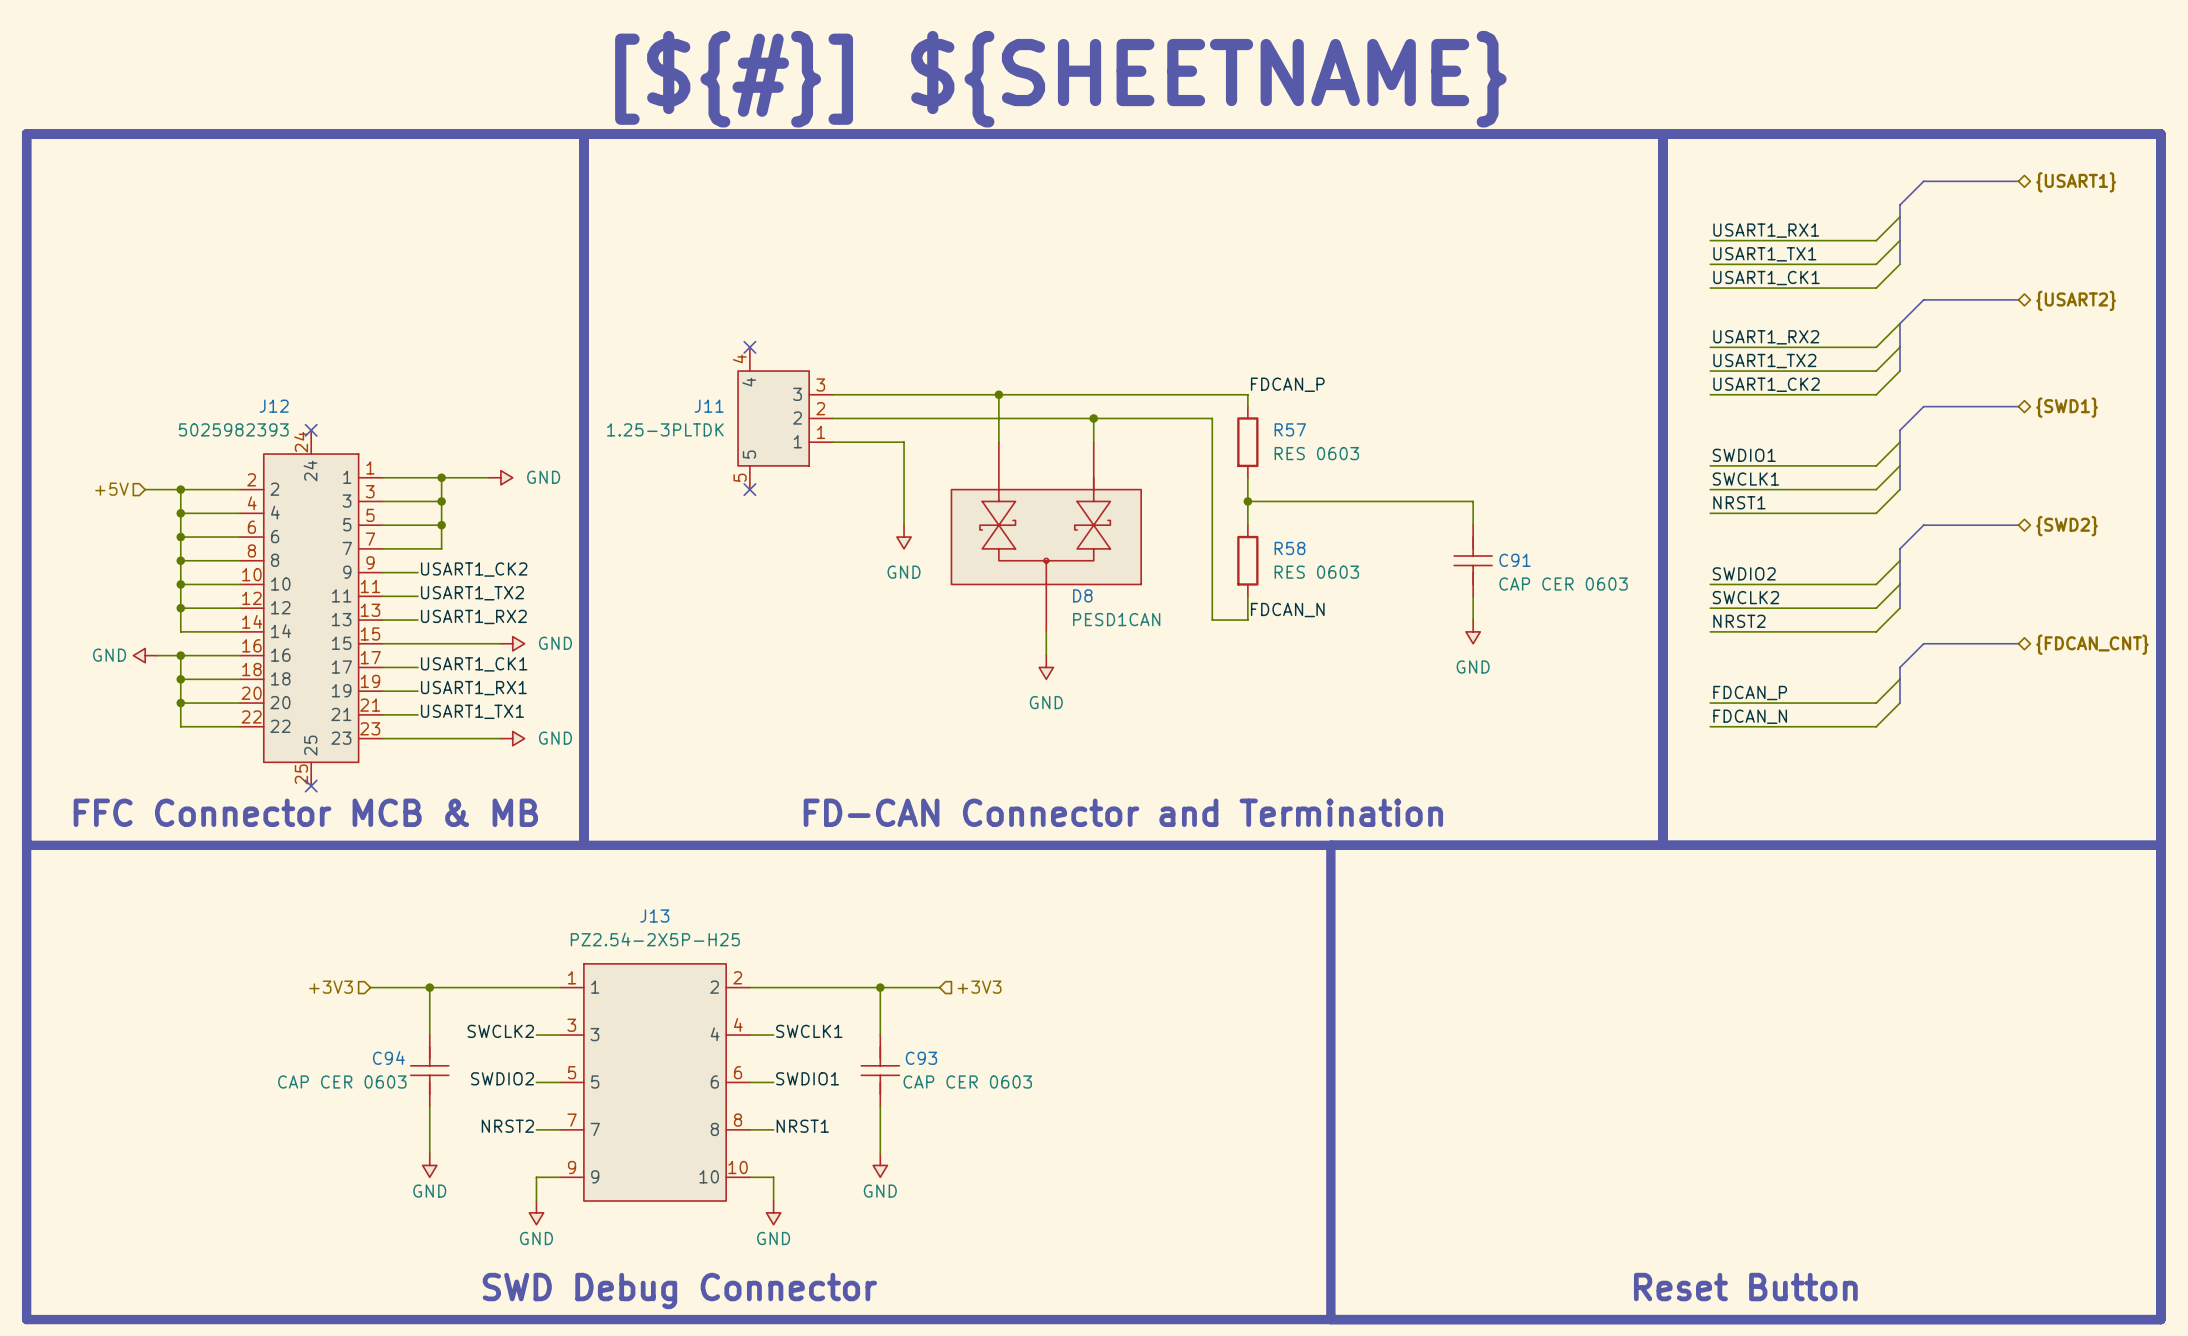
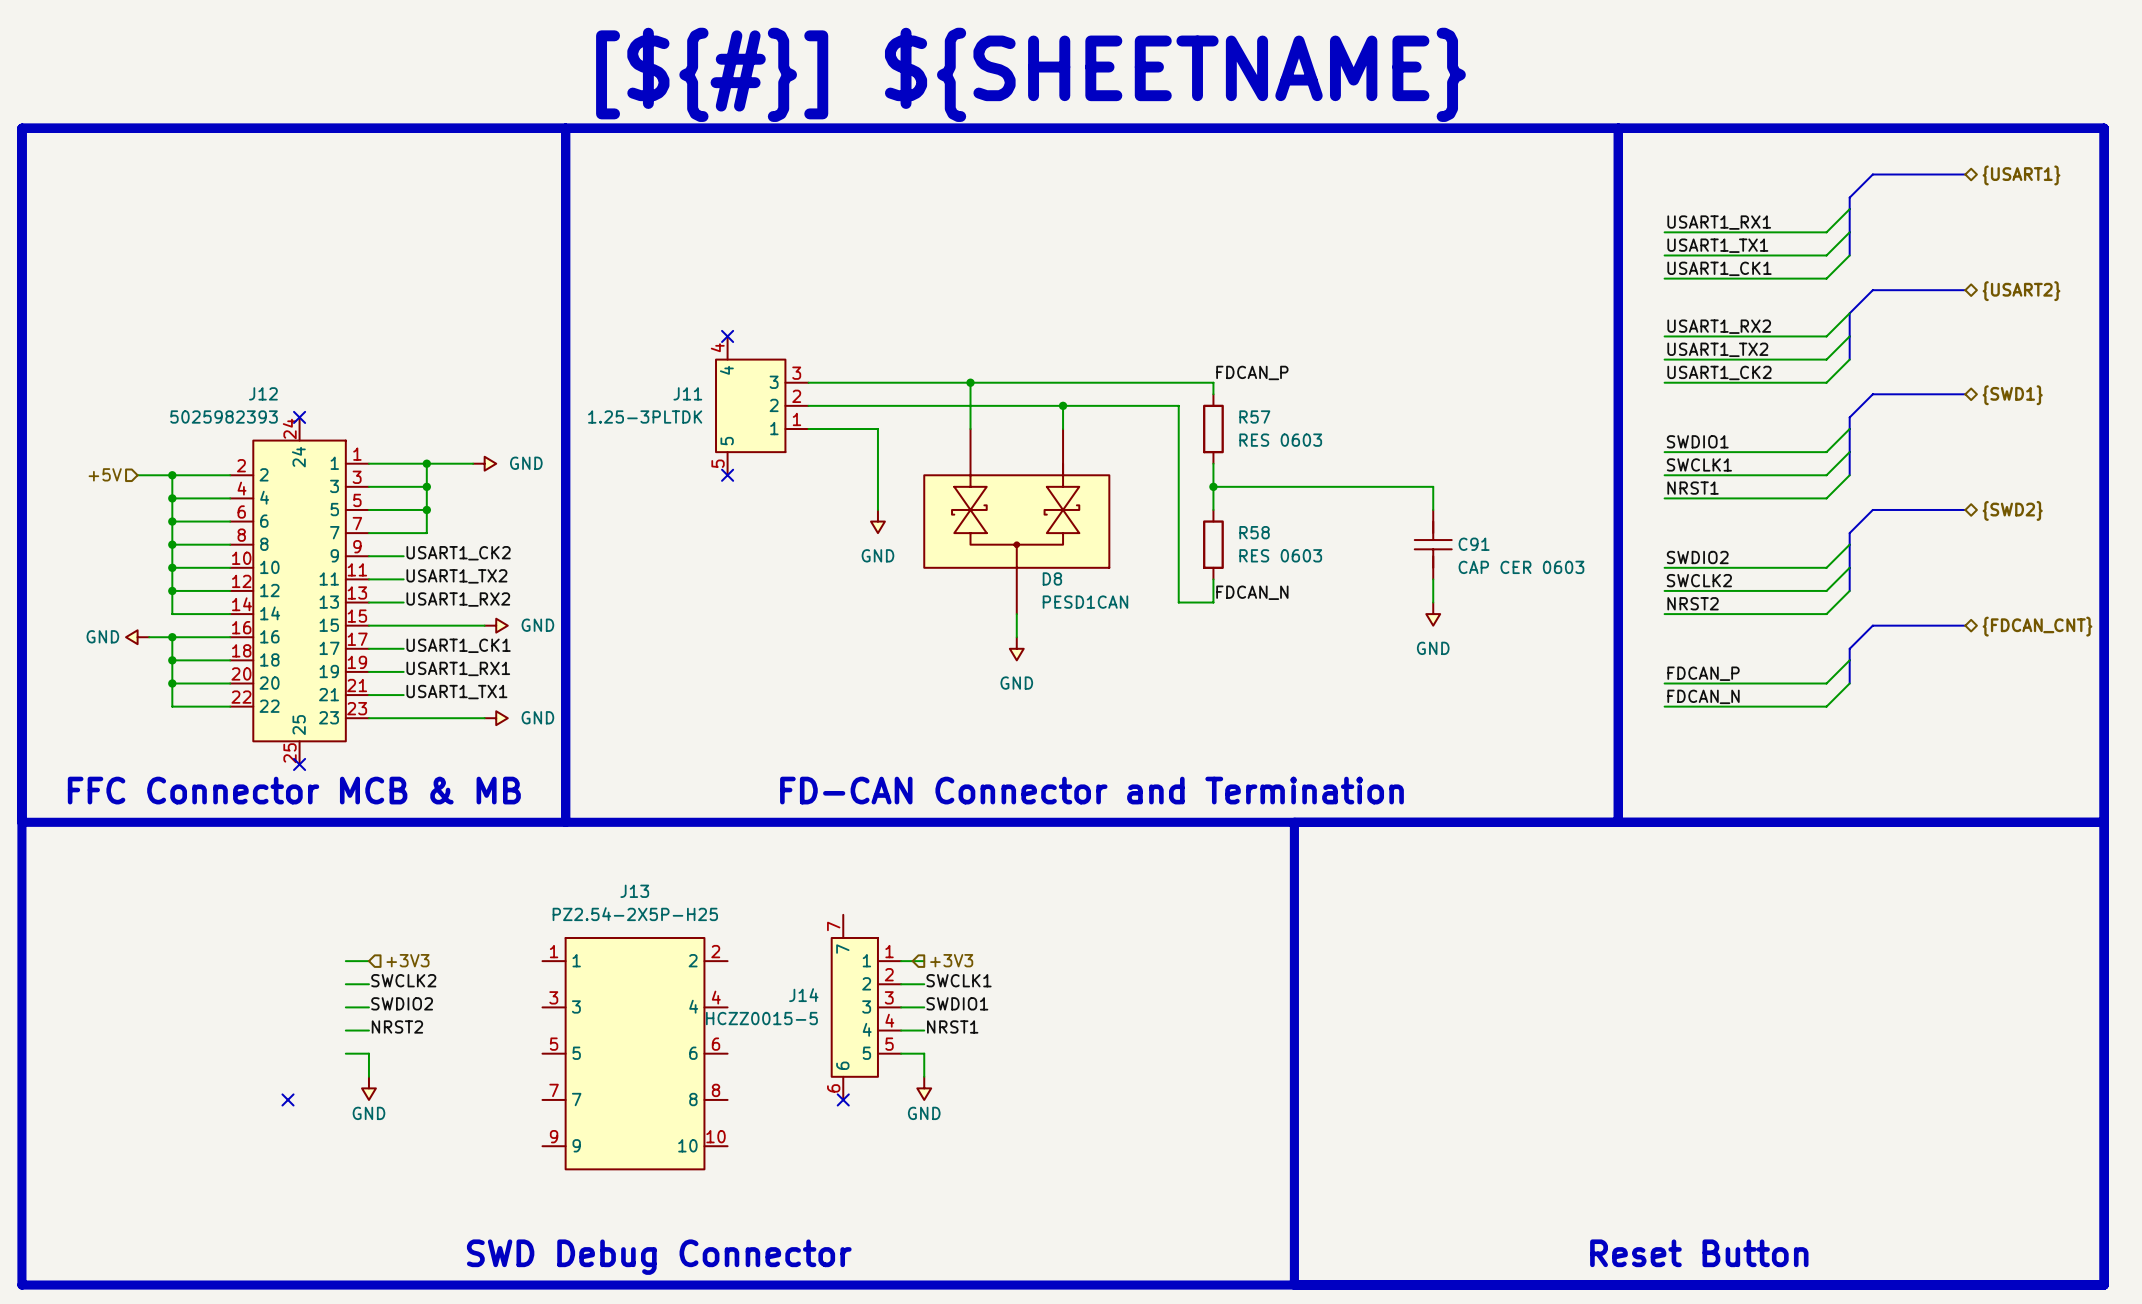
hierarchical label rotation: 0° (331, 987) -> 180° (407, 960)
hierarchical label position: +3V3 (331, 987) -> +3V3 (407, 960)
wire: none -> (345, 961) (357, 961)
wire: (382, 987) (560, 987) -> none
wire: (429, 987) (429, 1035) -> none
junction: (429, 987) -> none
wire: (749, 987) (927, 987) -> none
junction: (880, 987) -> none
wire: none -> (912, 961) (924, 961)
label position: SWCLK2 (500, 1031) -> SWCLK2 (403, 980)
label position: SWCLK1 (809, 1031) -> SWCLK1 (959, 980)
wire: (536, 1035) (560, 1035) -> (345, 984) (368, 984)
wire: (749, 1035) (773, 1035) -> (901, 984) (924, 984)
J14: none -> HCZZ0015-5 (866, 1007)
C94: CAP CER 0603 (429, 1070) -> none
C93: CAP CER 0603 (880, 1070) -> none
label position: SWDIO2 (502, 1078) -> SWDIO2 (402, 1003)
label position: SWDIO1 (807, 1078) -> SWDIO1 (957, 1003)
wire: none -> (345, 1053) (368, 1053) (368, 1076)
wire: (536, 1082) (560, 1082) -> (345, 1030) (368, 1030)
wire: (749, 1082) (773, 1082) -> (901, 1030) (924, 1030)
wire: (429, 1106) (429, 1153) -> none
wire: (880, 1106) (880, 1153) -> none
label position: NRST2 (507, 1126) -> NRST2 (397, 1026)
label position: NRST1 (802, 1126) -> NRST1 (952, 1026)
no-connect mark: none -> (287, 1099)
wire: (536, 1129) (560, 1129) -> (345, 1007) (368, 1007)
wire: (749, 1129) (773, 1129) -> (901, 1007) (924, 1007)
no-connect mark: none -> (843, 1099)
power symbol position: GND (429, 1165) -> GND (368, 1088)
power symbol position: GND (880, 1165) -> GND (924, 1088)
wire: (560, 1177) (536, 1177) (536, 1201) -> none
wire: (749, 1177) (773, 1177) (773, 1201) -> (901, 1053) (924, 1053) (924, 1076)
power symbol: GND (536, 1212) -> none
power symbol: GND (773, 1212) -> none

